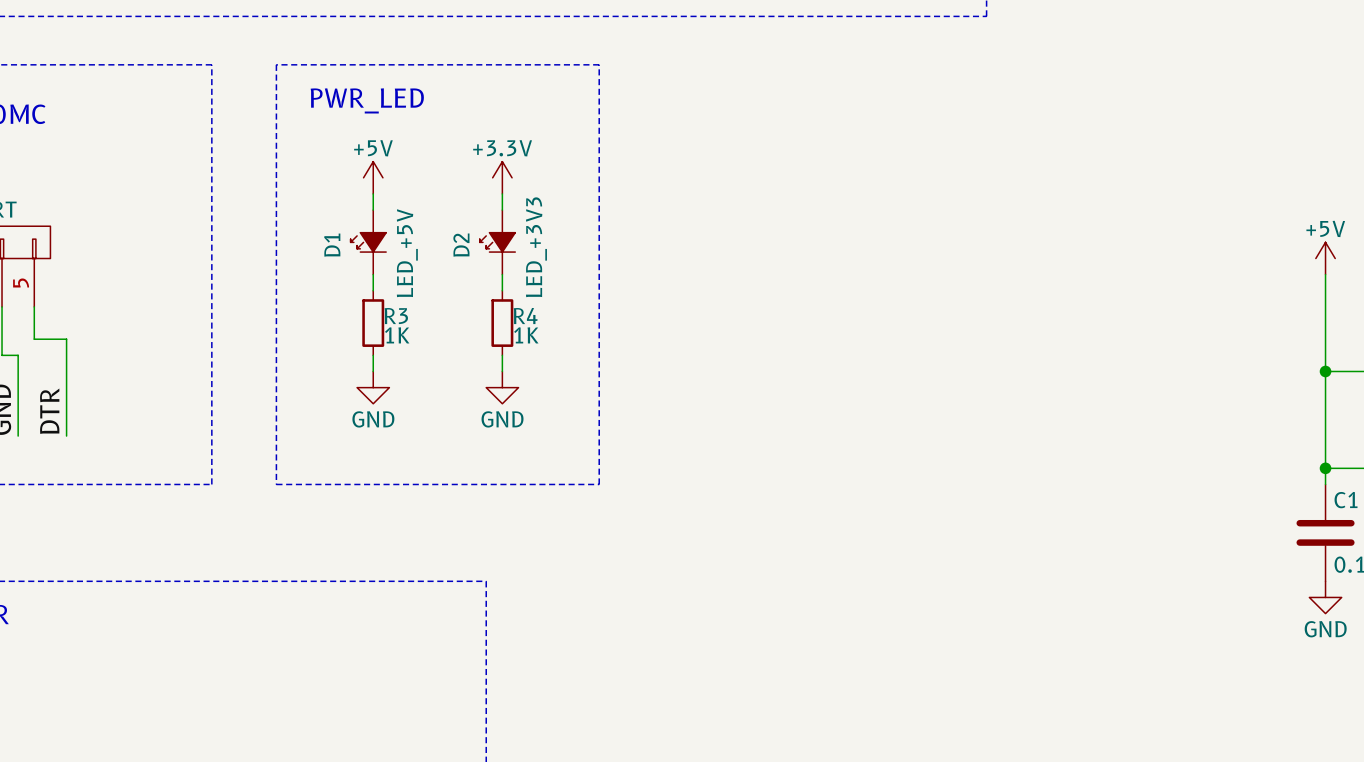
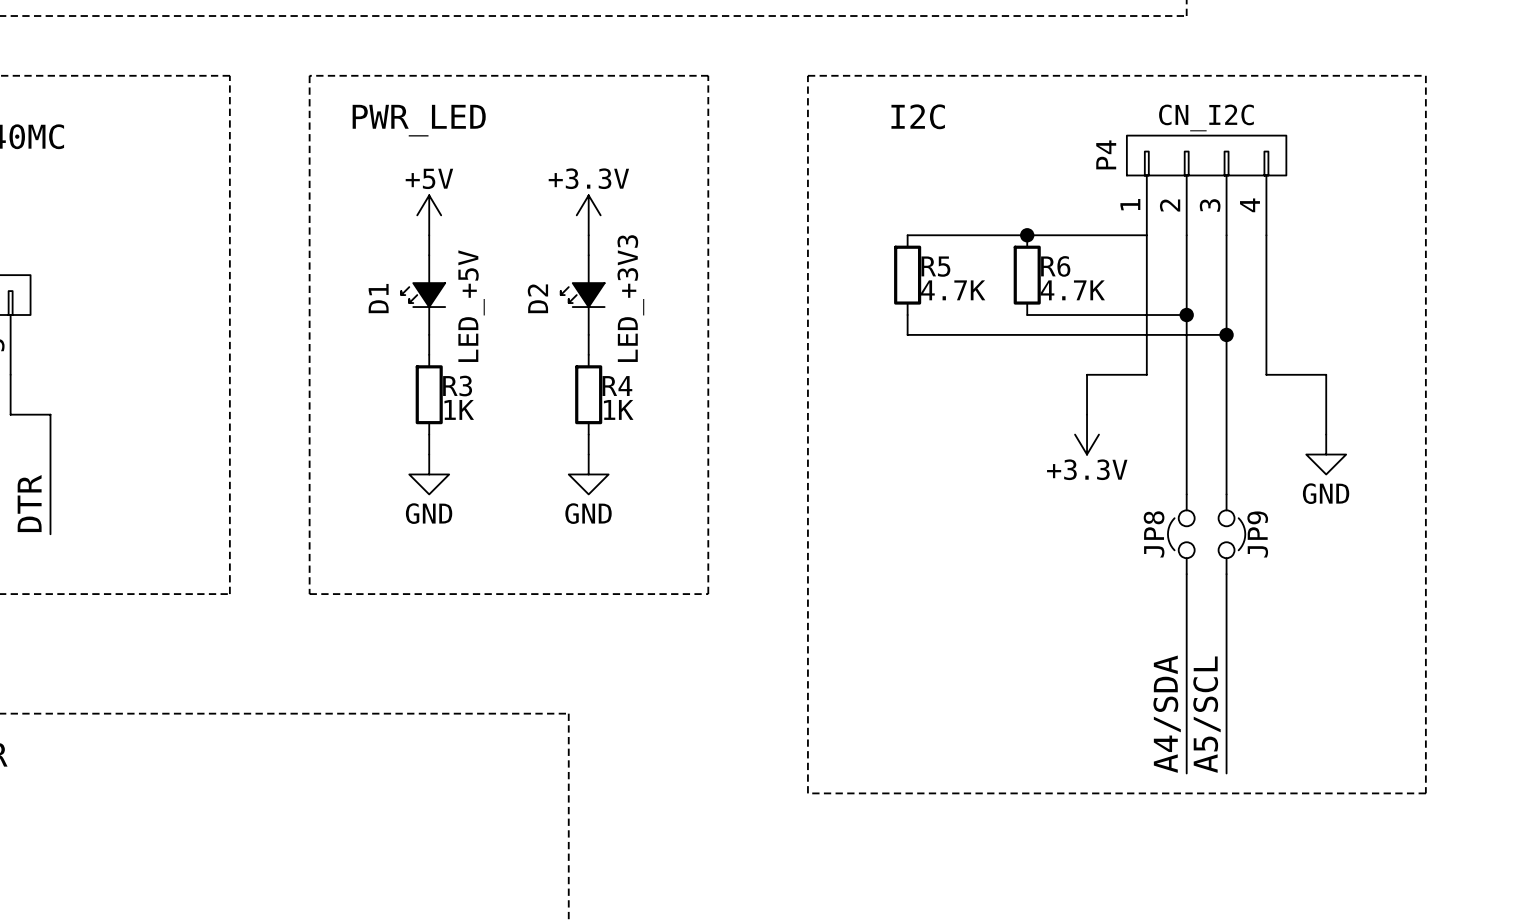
line: none -> (807, 75) (1425, 75) (1425, 793) (807, 793) (807, 75)
text: none -> I2C (918, 116)
P4: none -> CN_I2C (1206, 185)
wire: none -> (907, 235) (1146, 235) (1146, 374) (1087, 374) (1087, 414)
junction: none -> (1027, 235)
wire: none -> (1186, 235) (1186, 494)
wire: none -> (1226, 235) (1226, 494)
wire: none -> (1266, 235) (1266, 374) (1326, 374) (1326, 434)
R5: none -> 4.7K (907, 275)
R6: none -> 4.7K (1027, 275)
wire: none -> (907, 315) (907, 334) (1226, 334)
wire: none -> (1027, 315) (1186, 315)
junction: none -> (1186, 315)
junction: none -> (1226, 334)
power symbol: none -> +3.3V (1087, 434)
power symbol: none -> GND (1326, 454)
JP8: none -> (1181, 534)
JP9: none -> (1231, 534)
wire: none -> (1186, 574) (1186, 773)
wire: none -> (1226, 574) (1226, 773)
label: none -> A4/SDA (1167, 714)
label: none -> A5/SCL (1206, 714)

